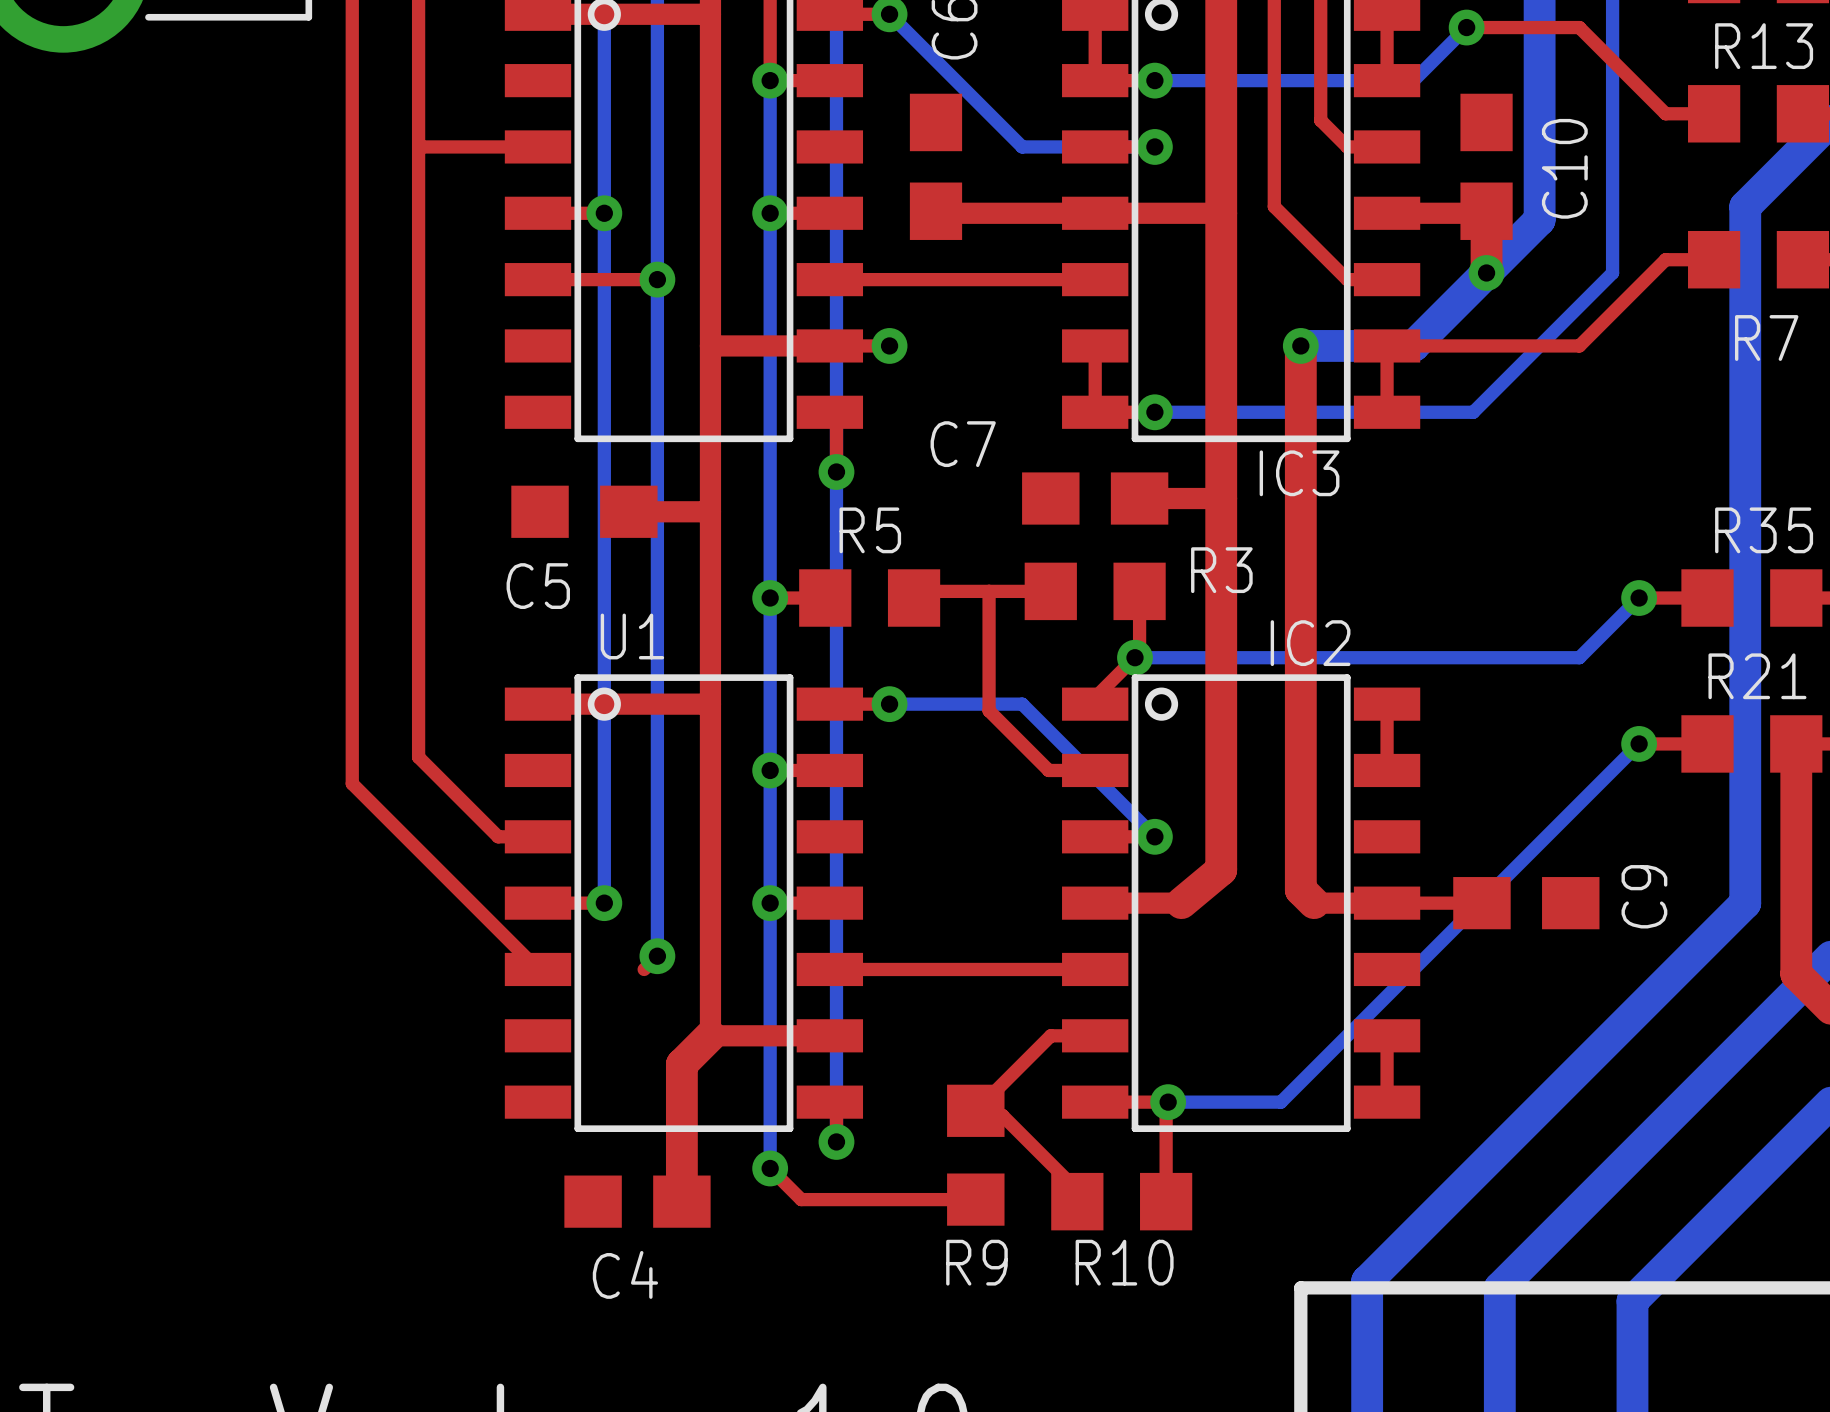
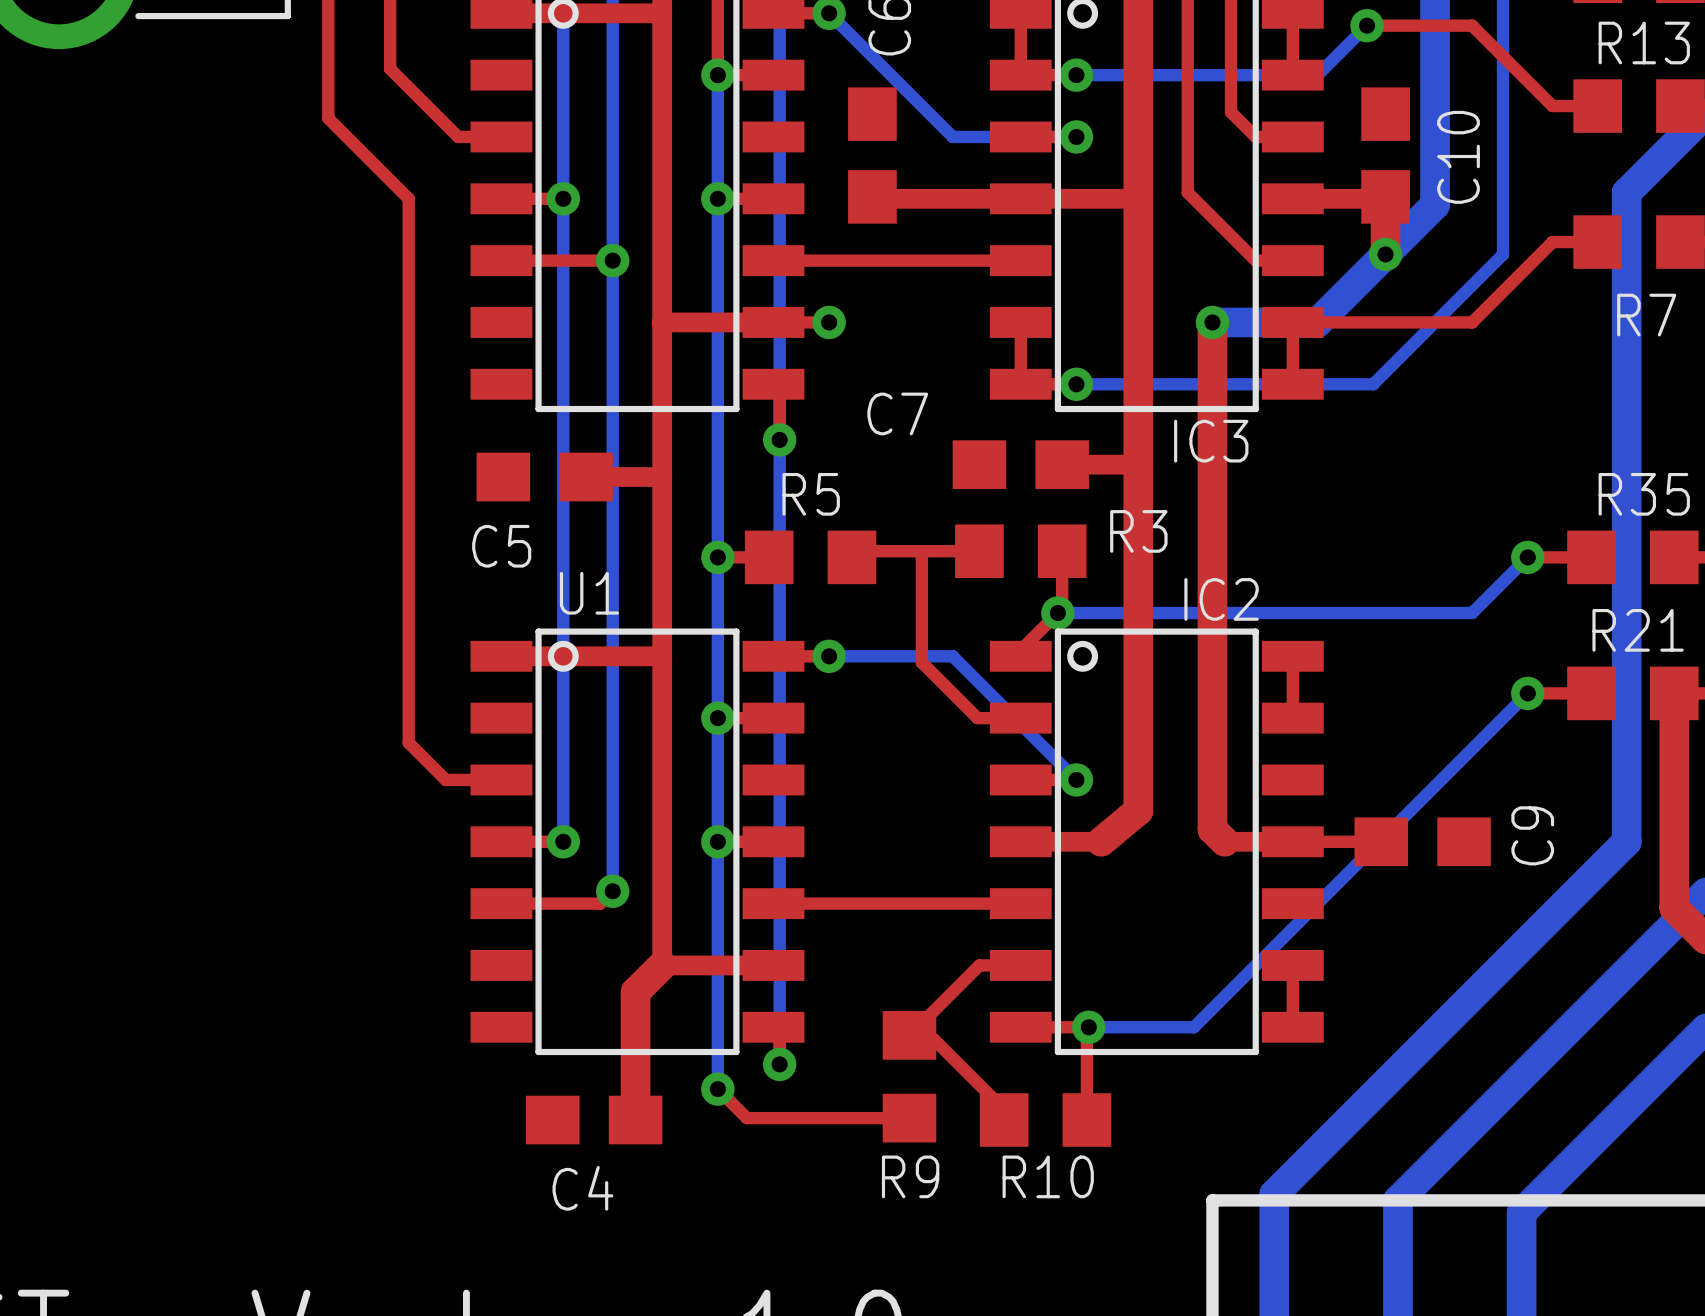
top track: (418, 73) (418, 757) (498, 836) -> (328, 118) (408, 198) (408, 742) (445, 779) (464, 779)
top track: (352, 127) (352, 783) (537, 969) -> (600, 903) (501, 903)
top track: (418, 146) (491, 146) -> (390, 68) (458, 136)

